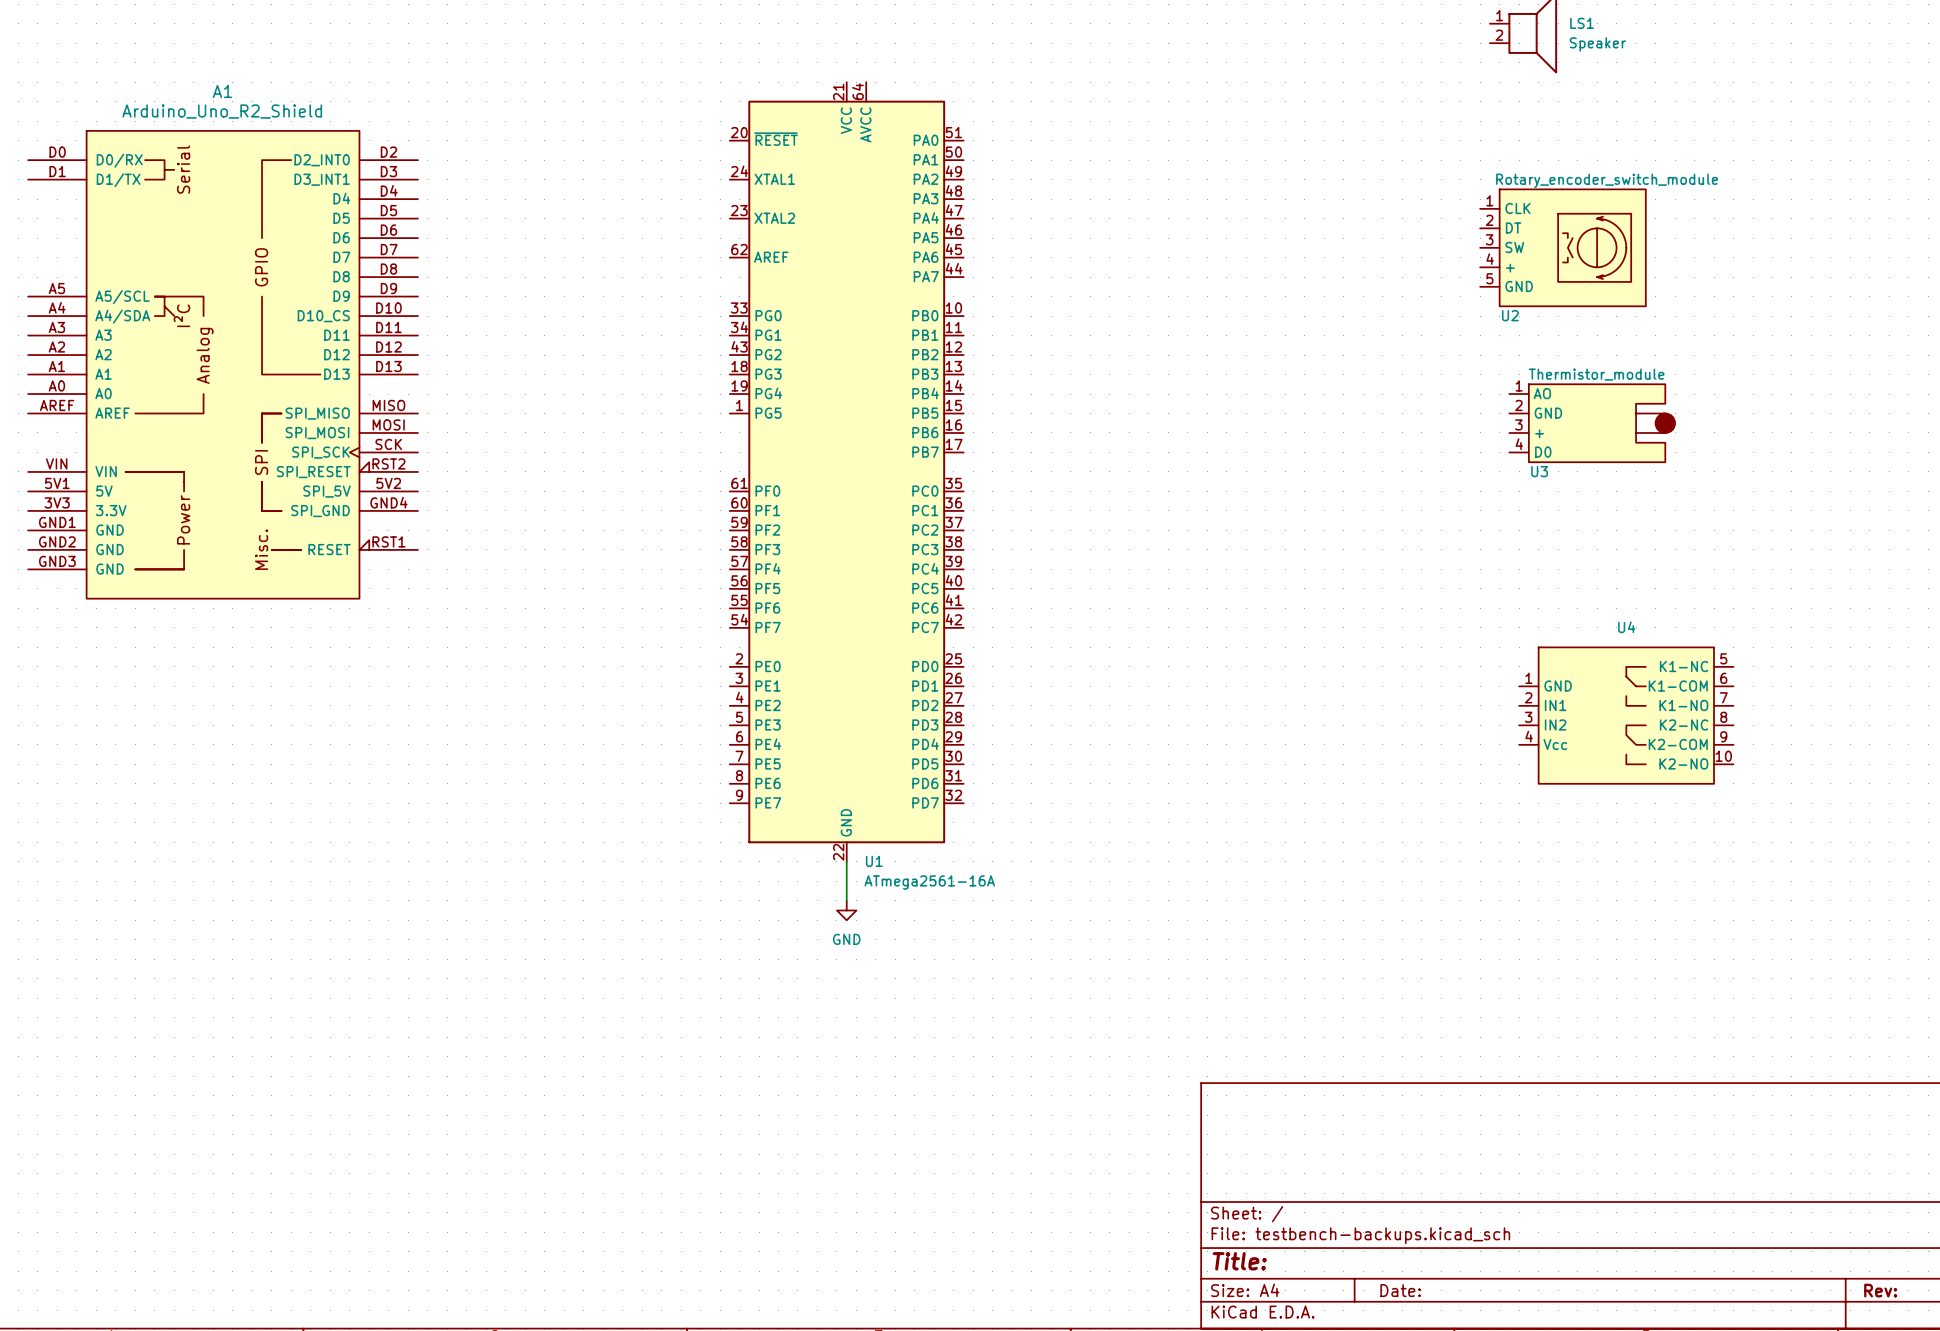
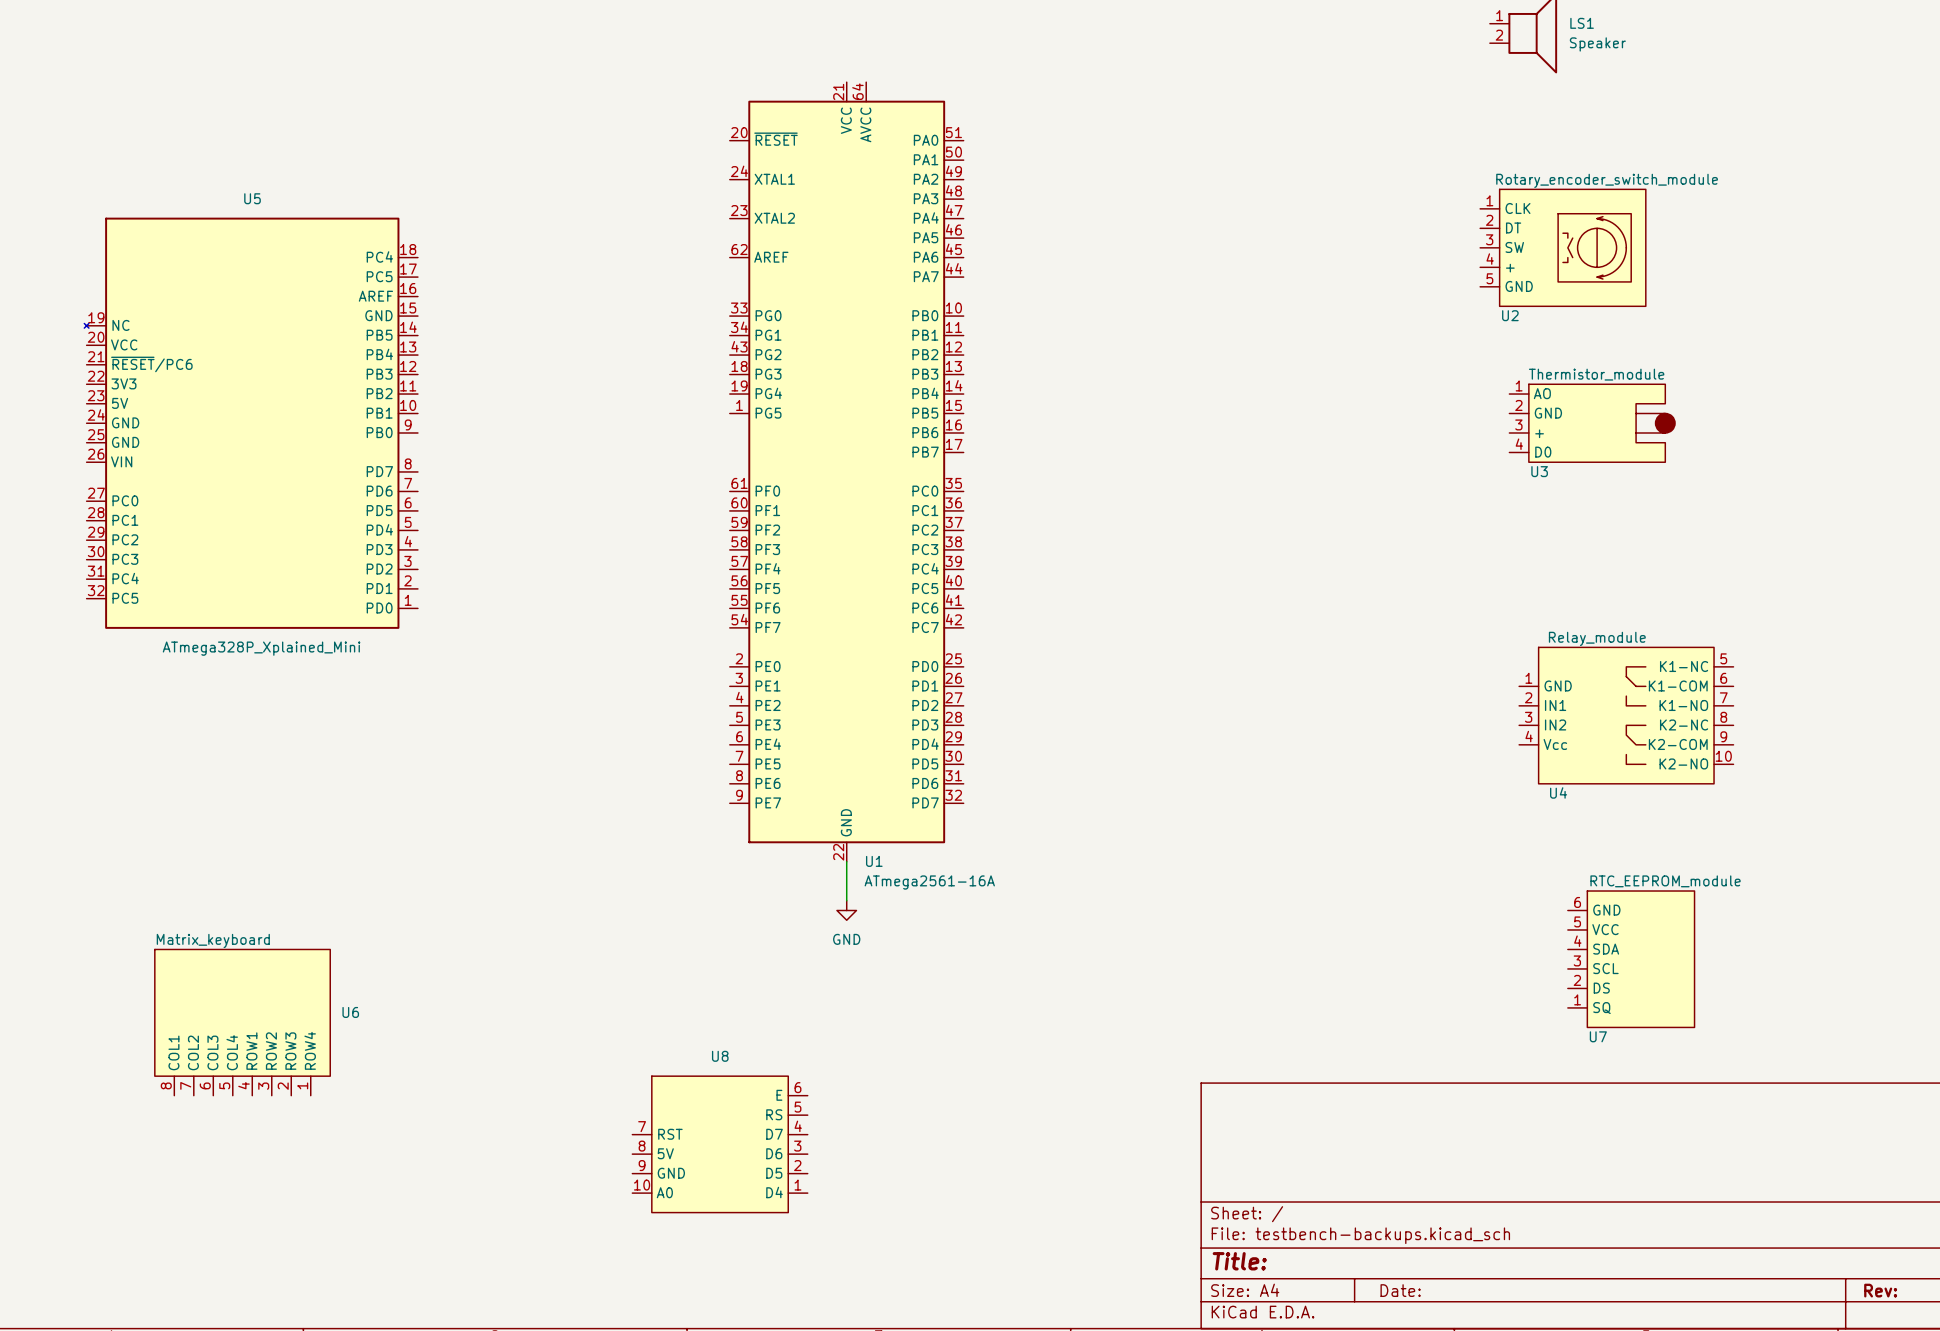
A1: Arduino_Uno_R2_Shield (223, 364) -> none
U5: none -> ATmega328P_Xplained_Mini (251, 423)
U4 name position: U4 (1626, 627) -> U4 (1558, 792)
U4 value: none -> Relay_module (1597, 638)
U7: none -> RTC_EEPROM_module (1631, 959)
U6: none -> Matrix_keyboard (242, 1022)
U8: none -> (720, 1144)

